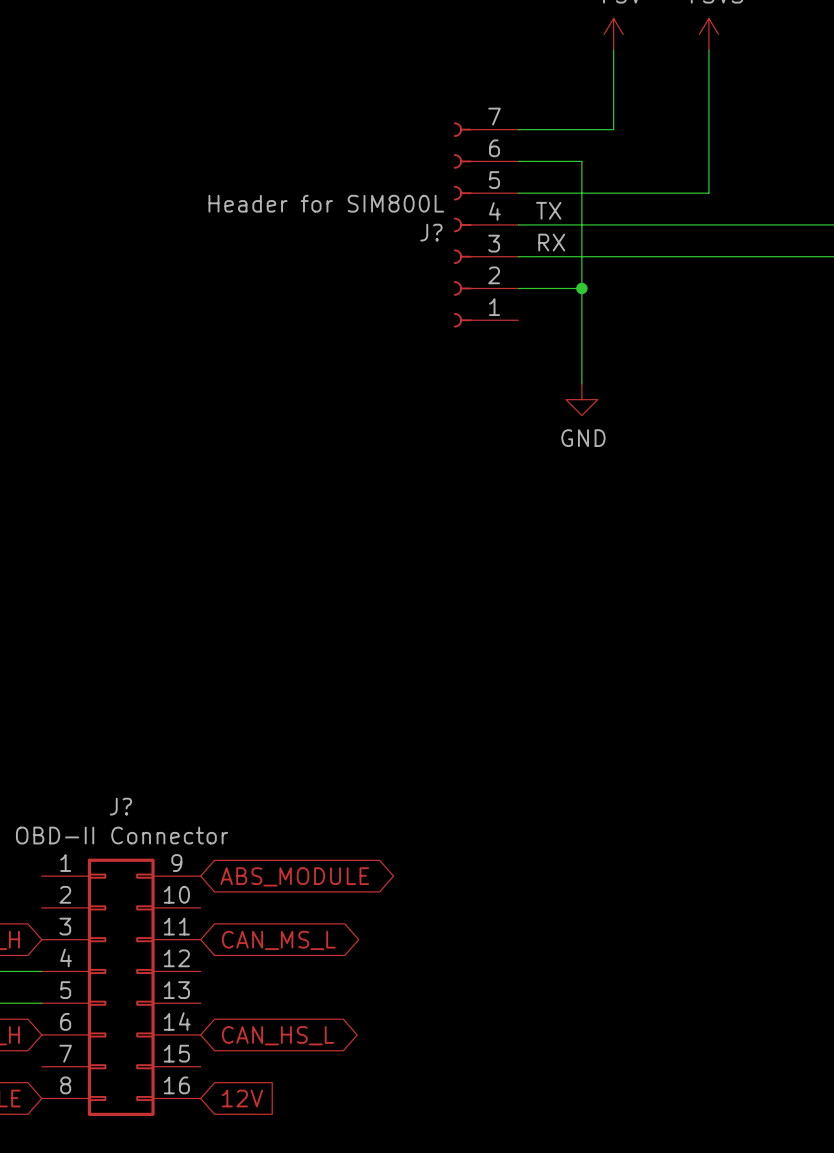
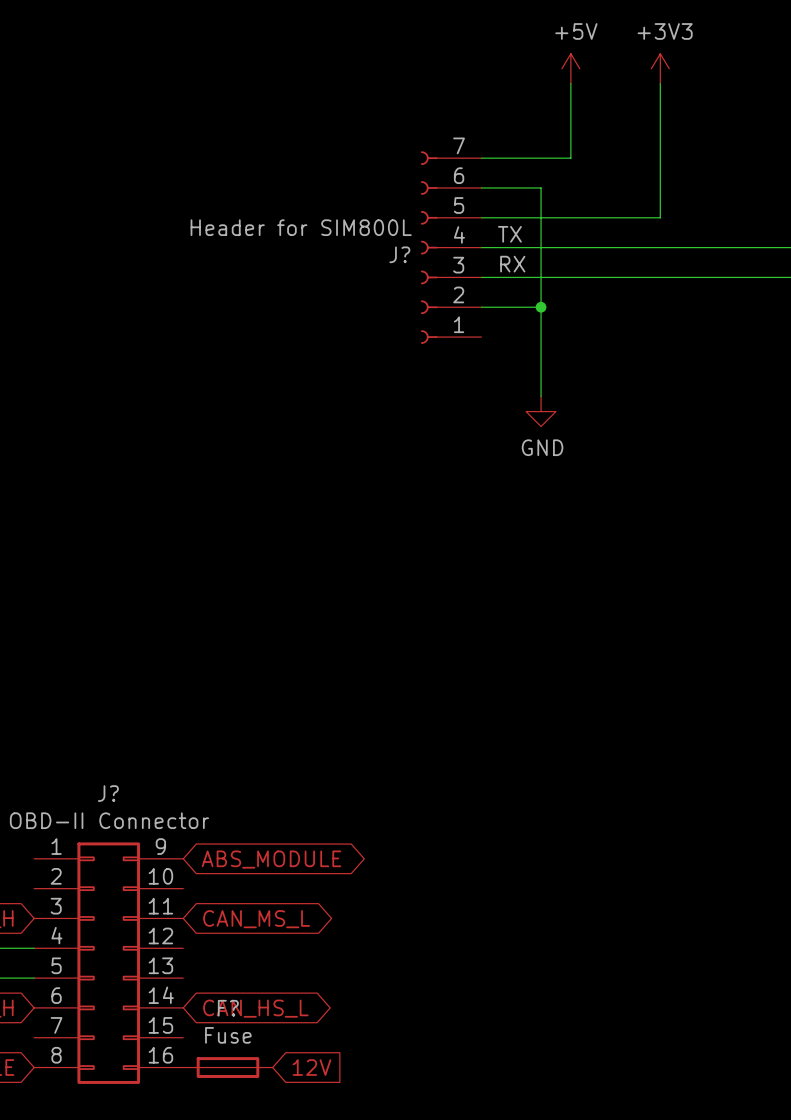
global label position: 12V (242, 1098) -> 12V (311, 1067)
F?: none -> Fuse (227, 1067)

